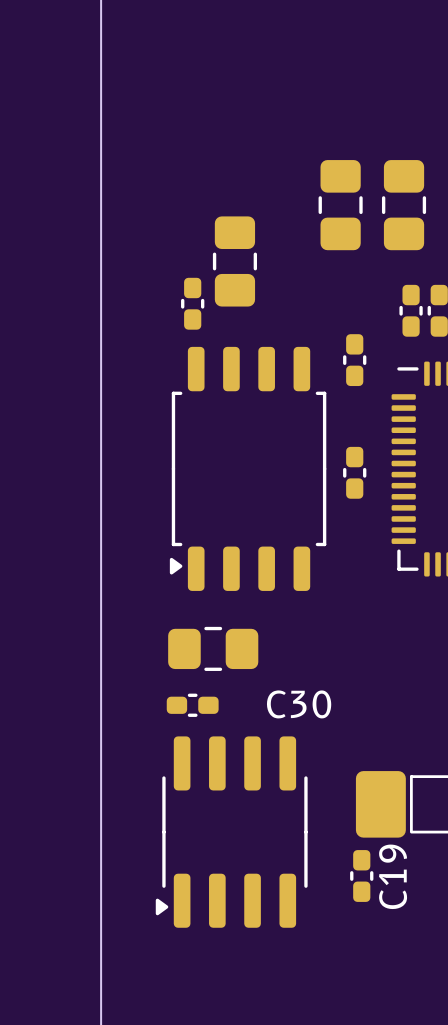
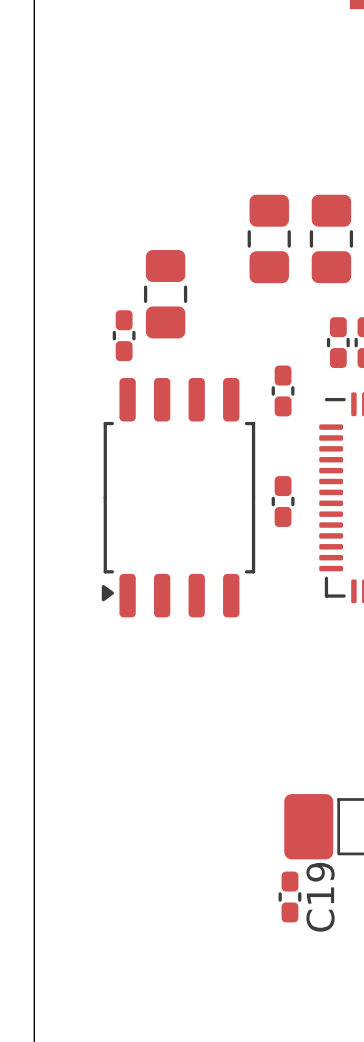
part: (213, 648) -> none
C30: (192, 705) -> none
part: (231, 832) -> none

